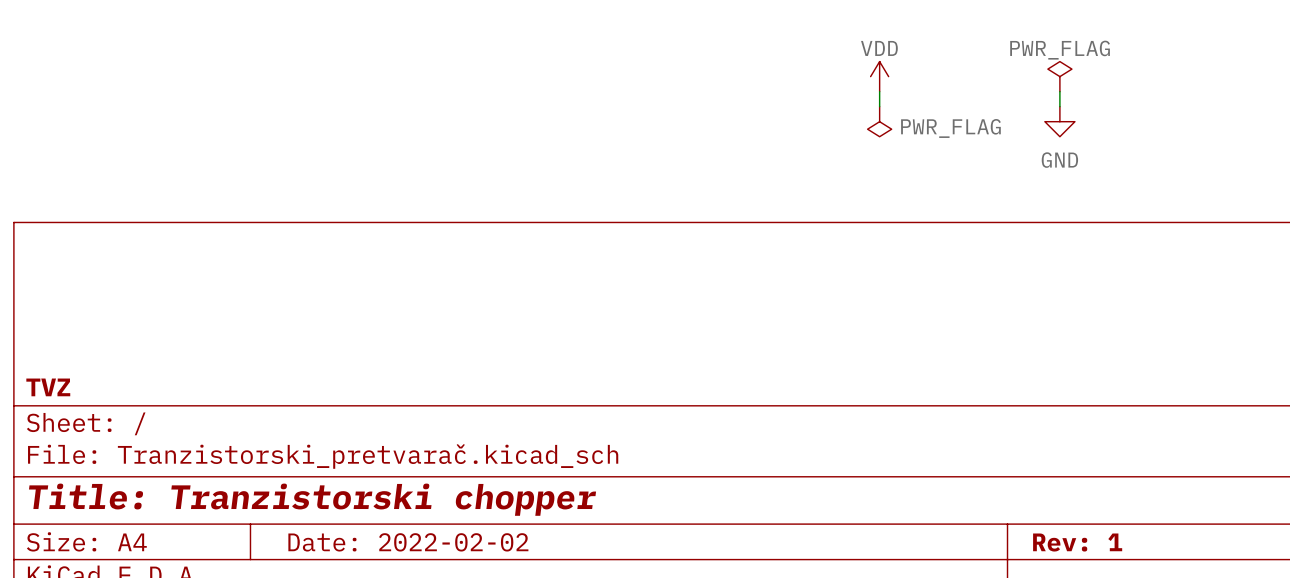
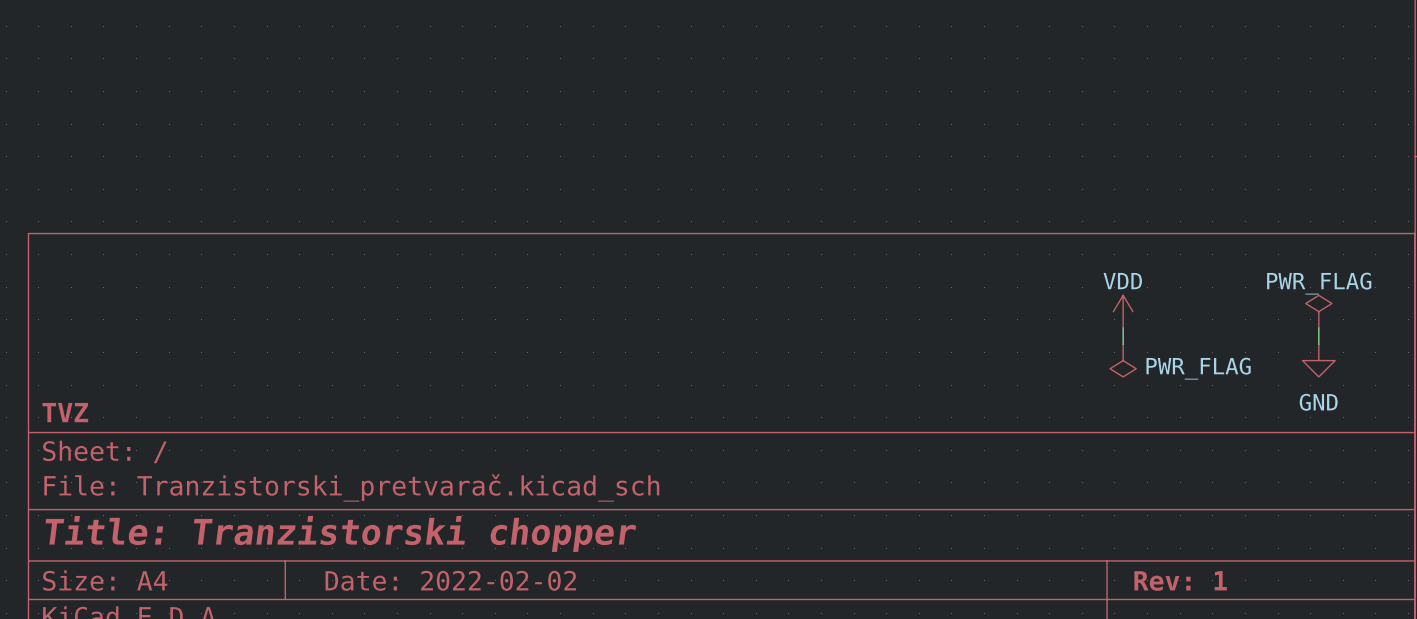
power symbol position: VDD (879, 76) -> VDD (1123, 311)
power symbol: PWR_FLAG (1059, 76) -> none
wire: (879, 91) (879, 106) -> (1123, 327) (1123, 344)
wire: (1059, 91) (1059, 106) -> (1318, 327) (1318, 344)
power symbol: PWR_FLAG (879, 121) -> none
power symbol position: GND (1059, 121) -> GND (1318, 360)
power symbol: none -> PWR_FLAG (1318, 311)
power symbol: none -> PWR_FLAG (1123, 360)

